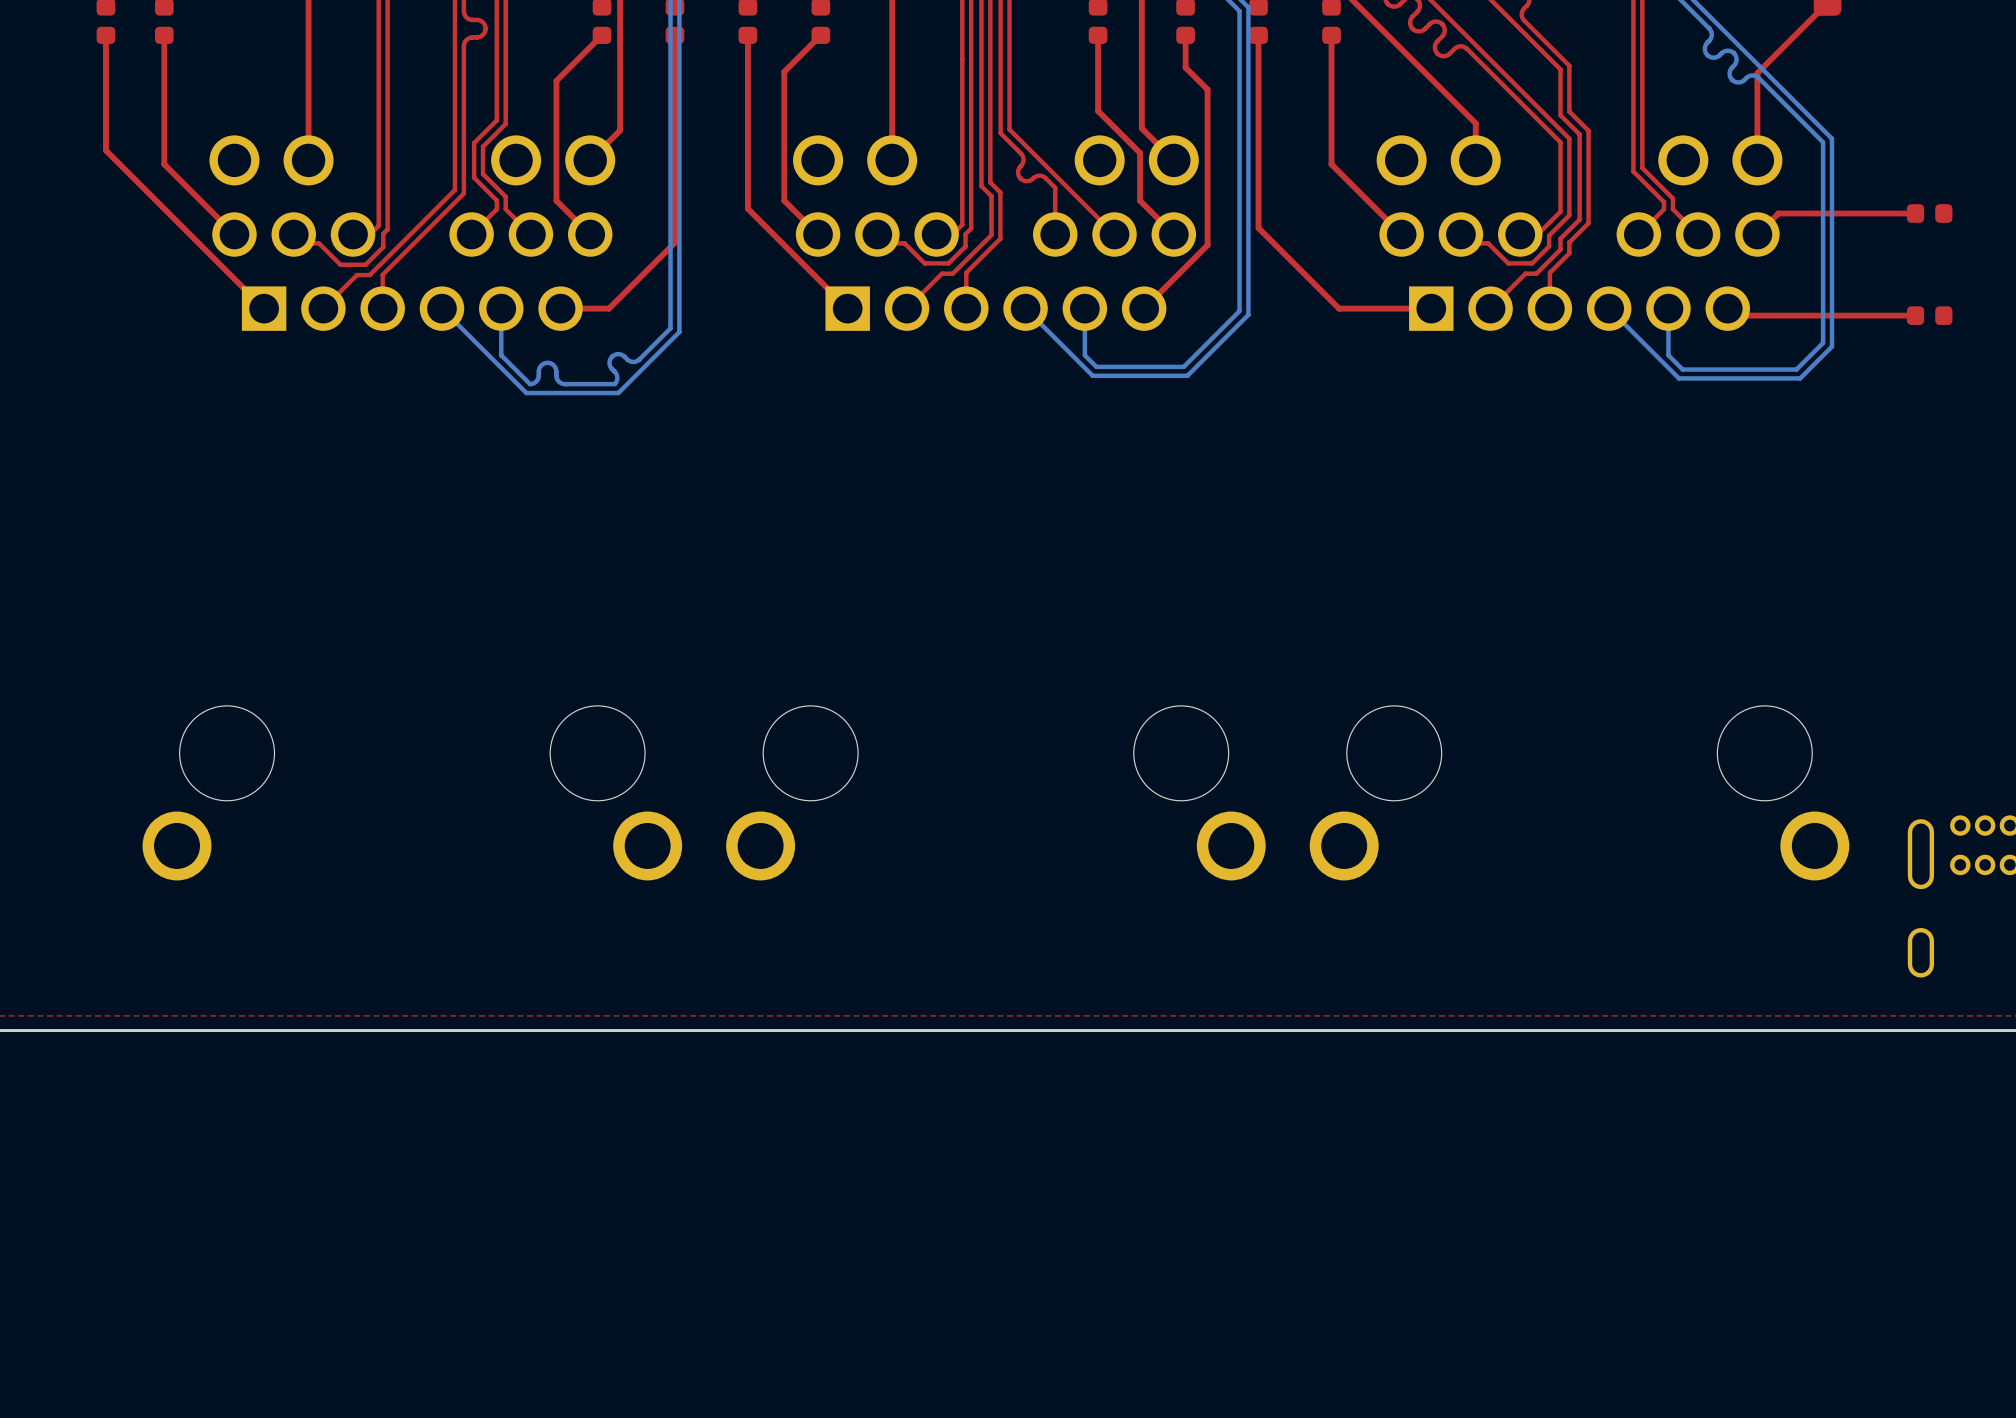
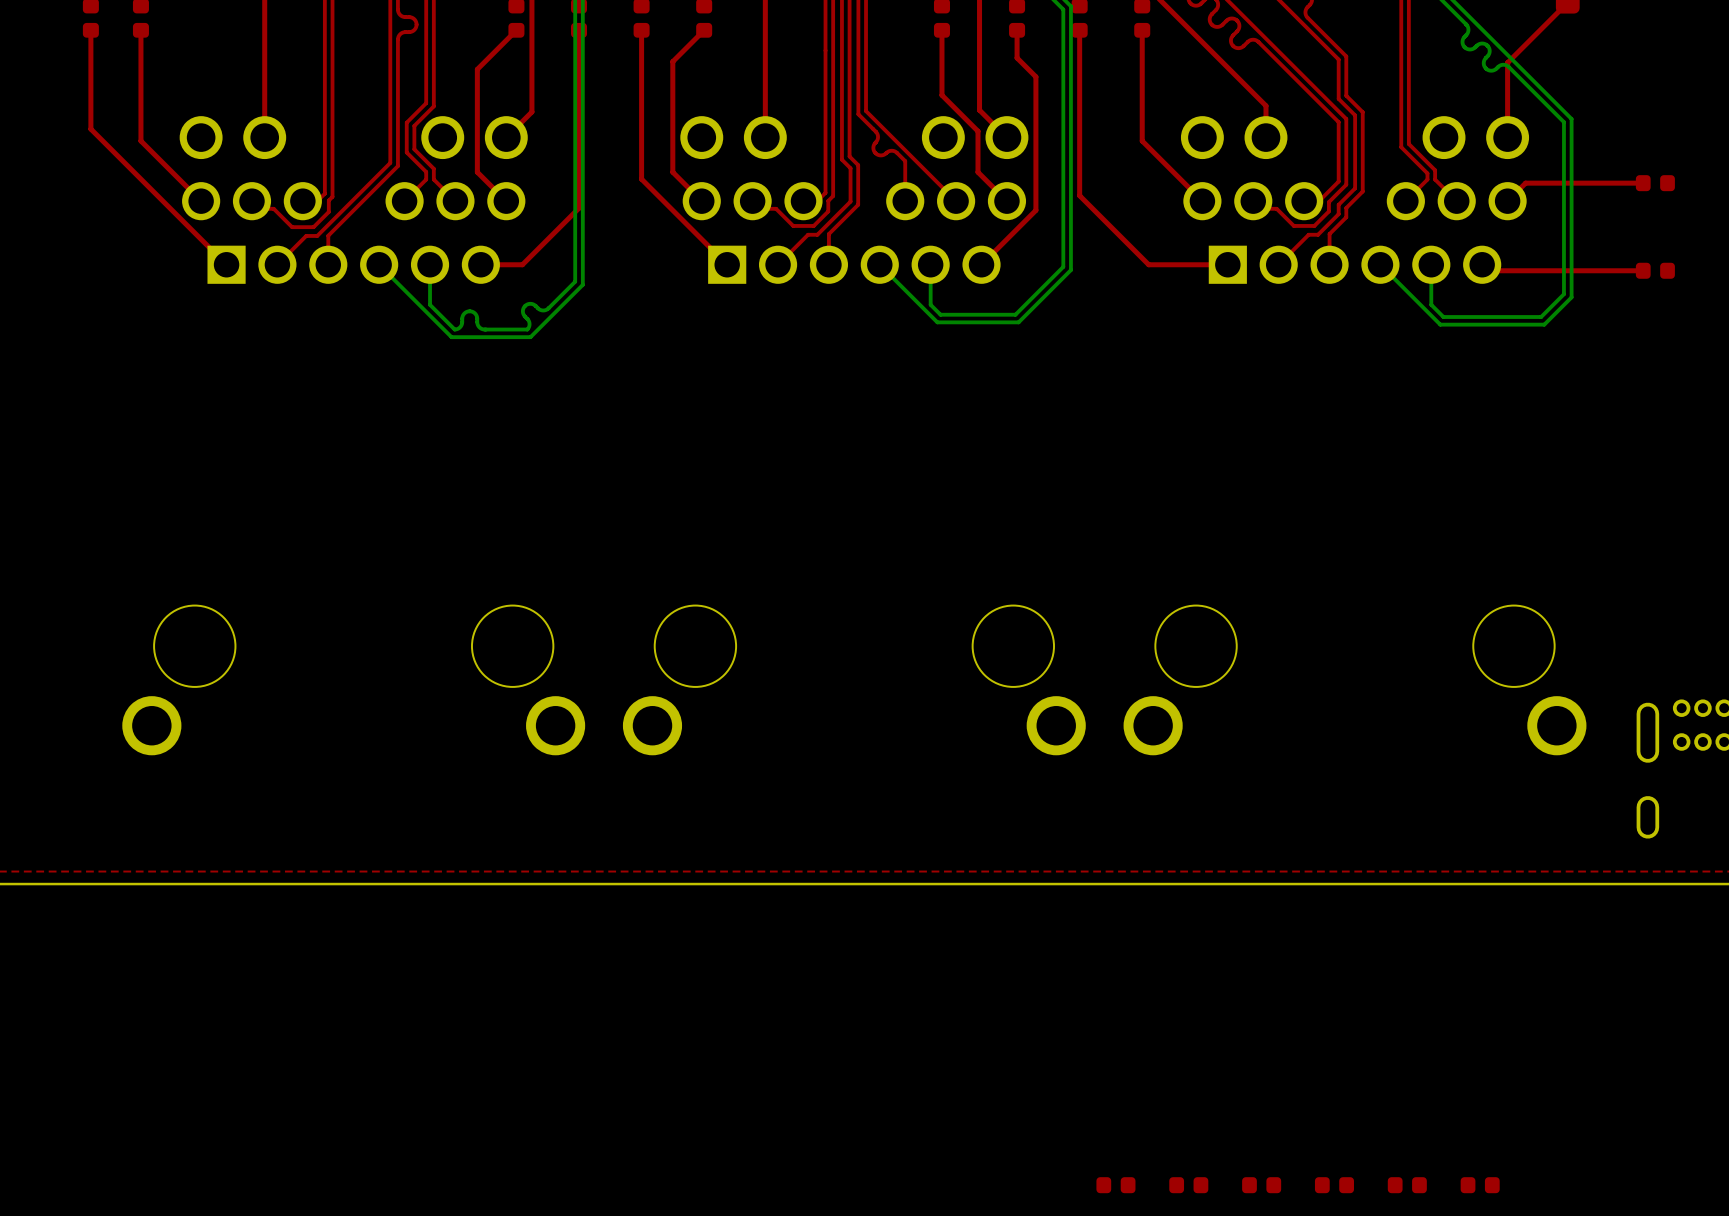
part: none -> (1115, 1185)
part: none -> (1188, 1185)
part: none -> (1261, 1185)
part: none -> (1334, 1185)
part: none -> (1407, 1185)
part: none -> (1480, 1185)

